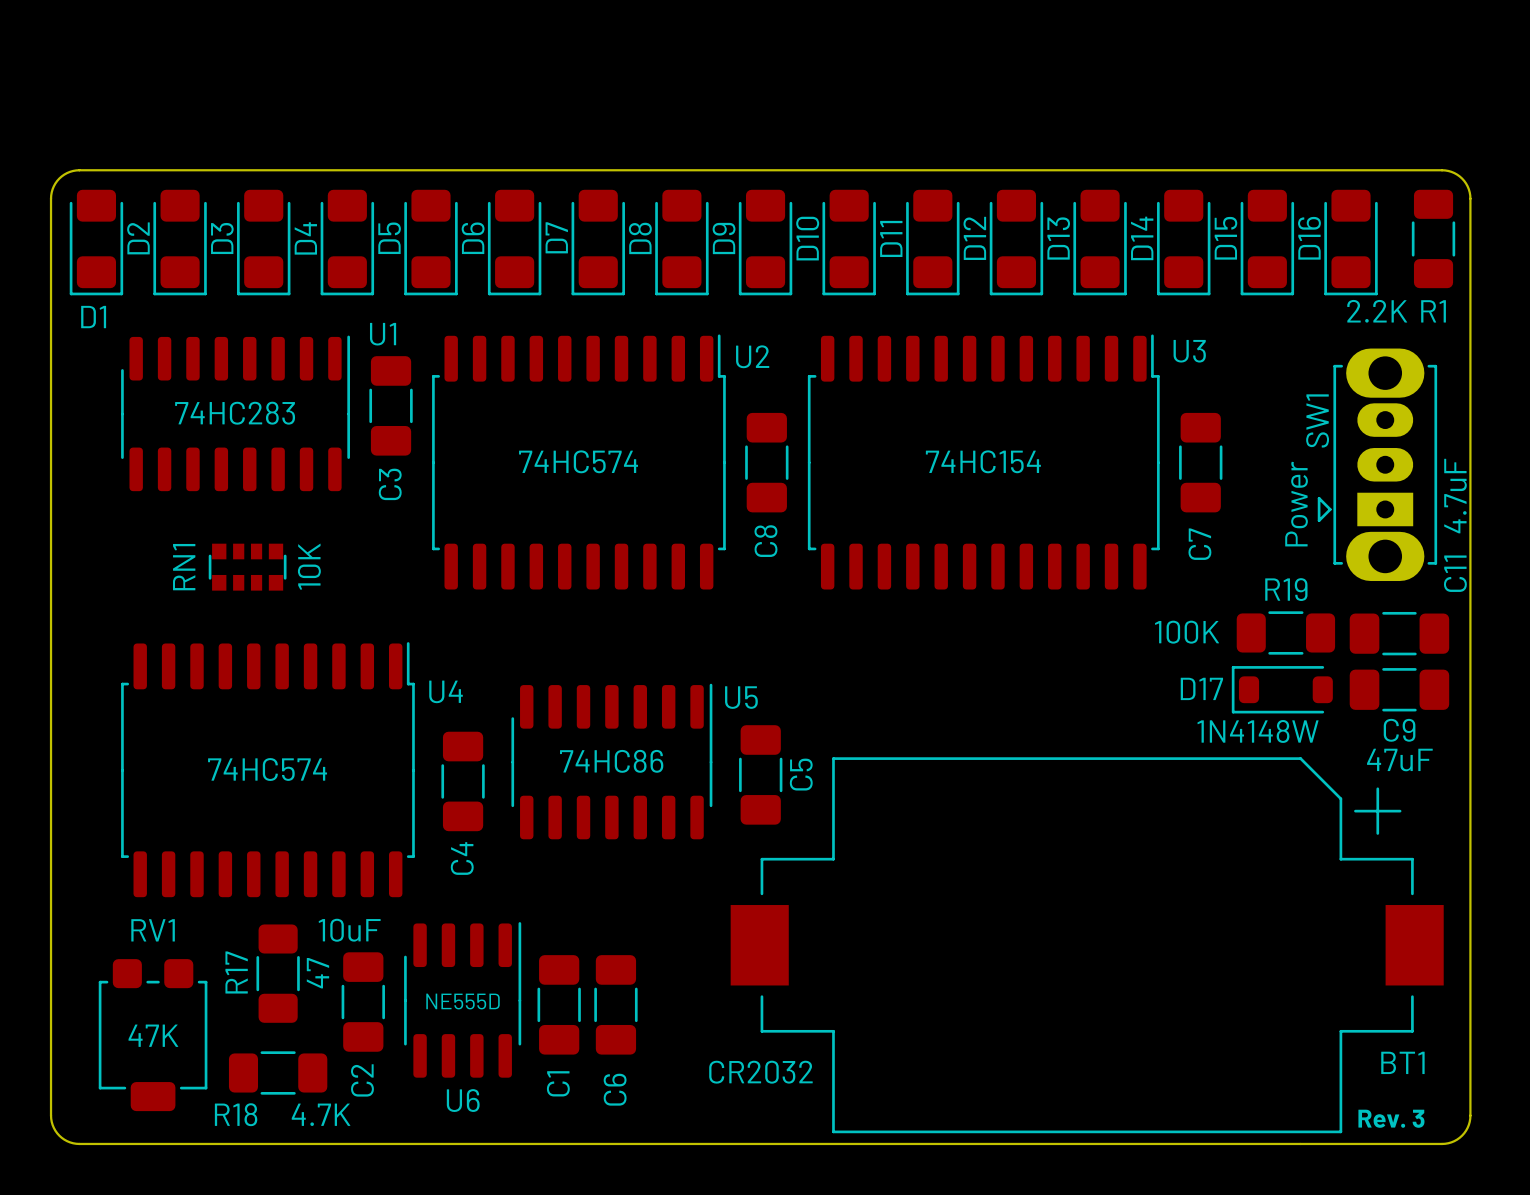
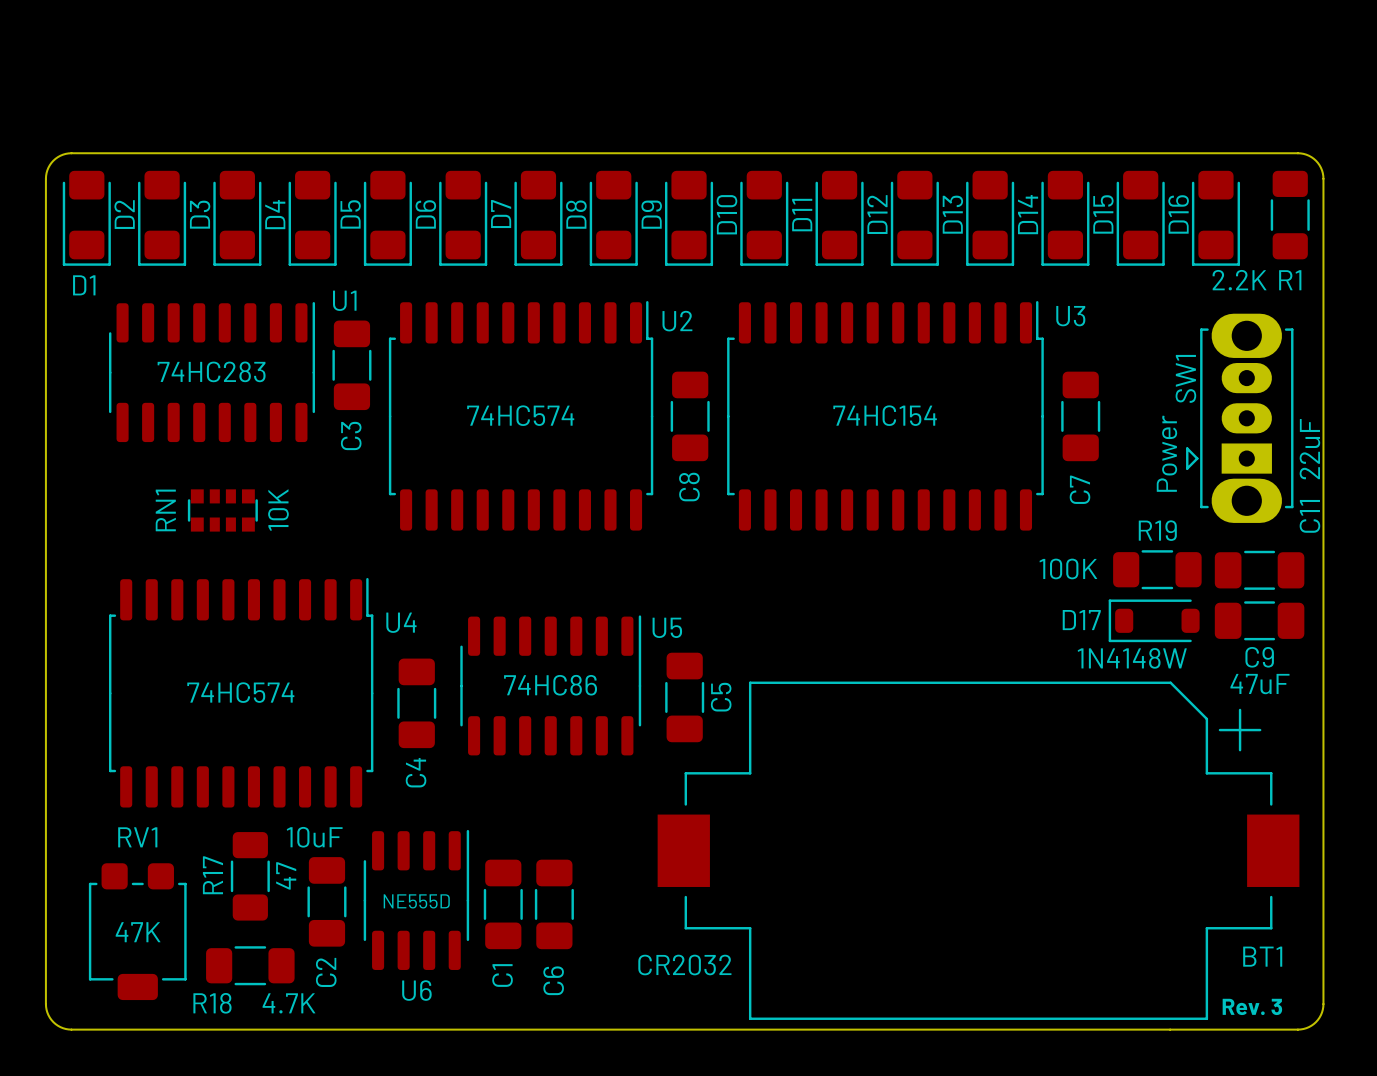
C11 value: 4.7uF (1455, 496) -> 22uF (1309, 449)

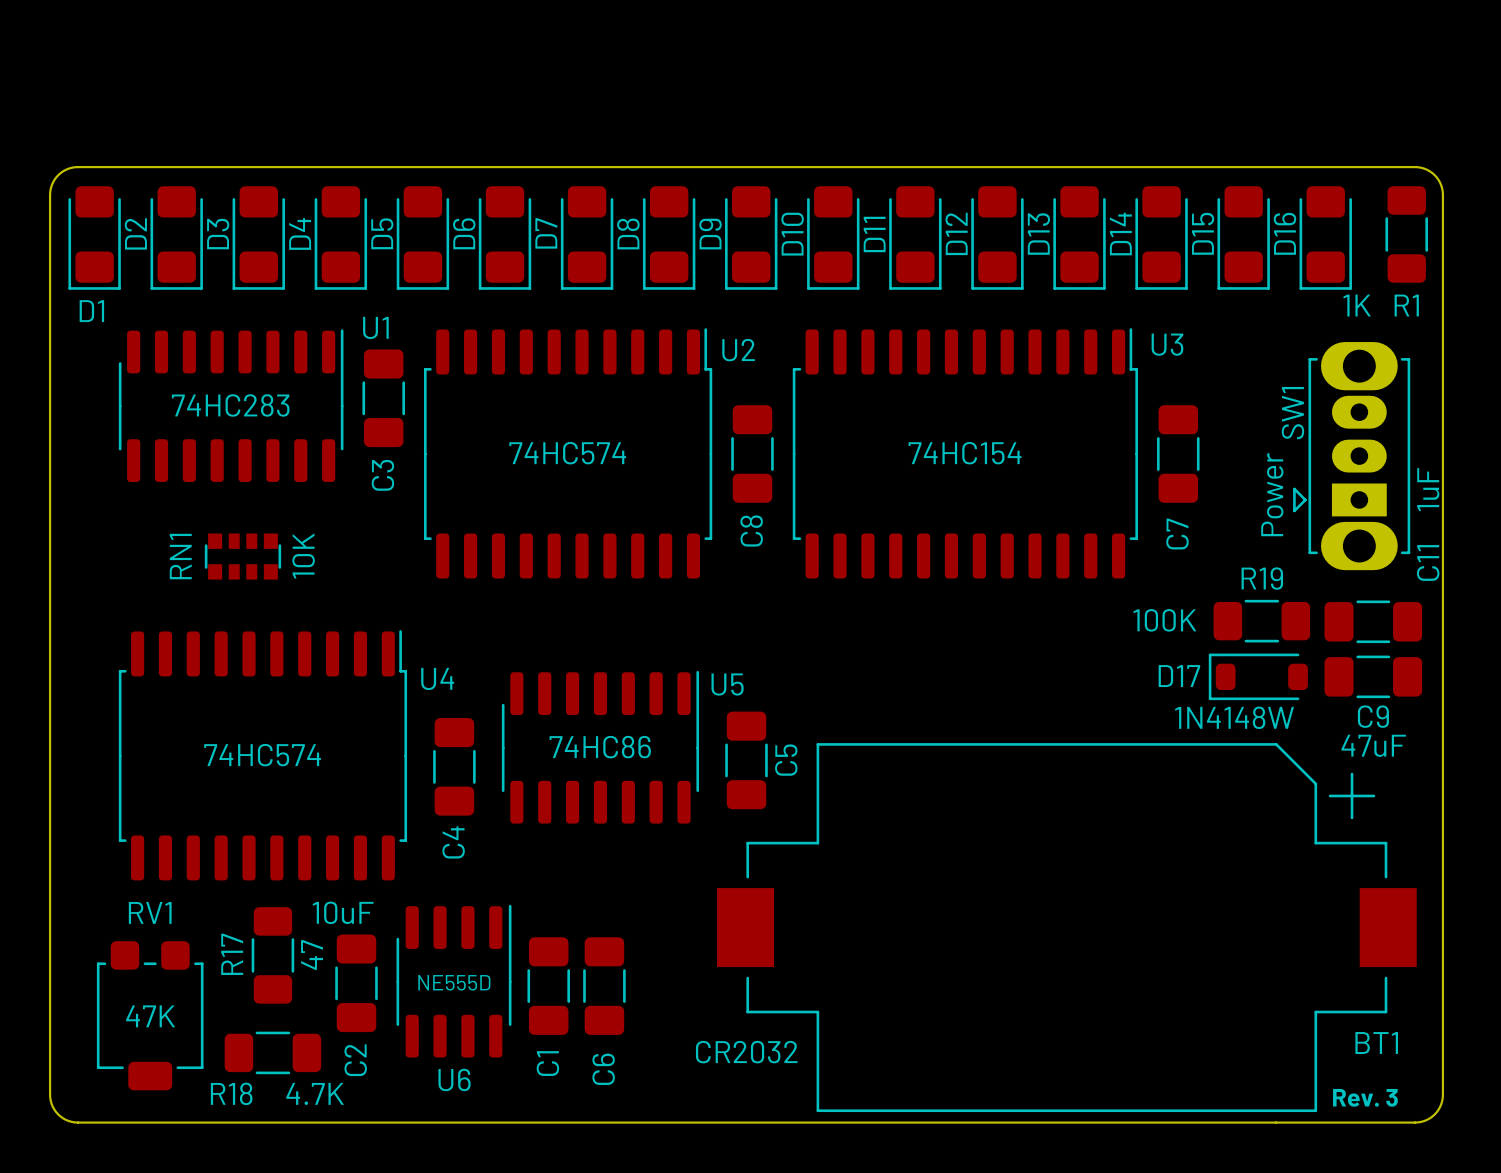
R1 value: 2.2K (1239, 280) -> 1K (1357, 305)
C11 value: 22uF (1309, 449) -> 1uF (1428, 489)

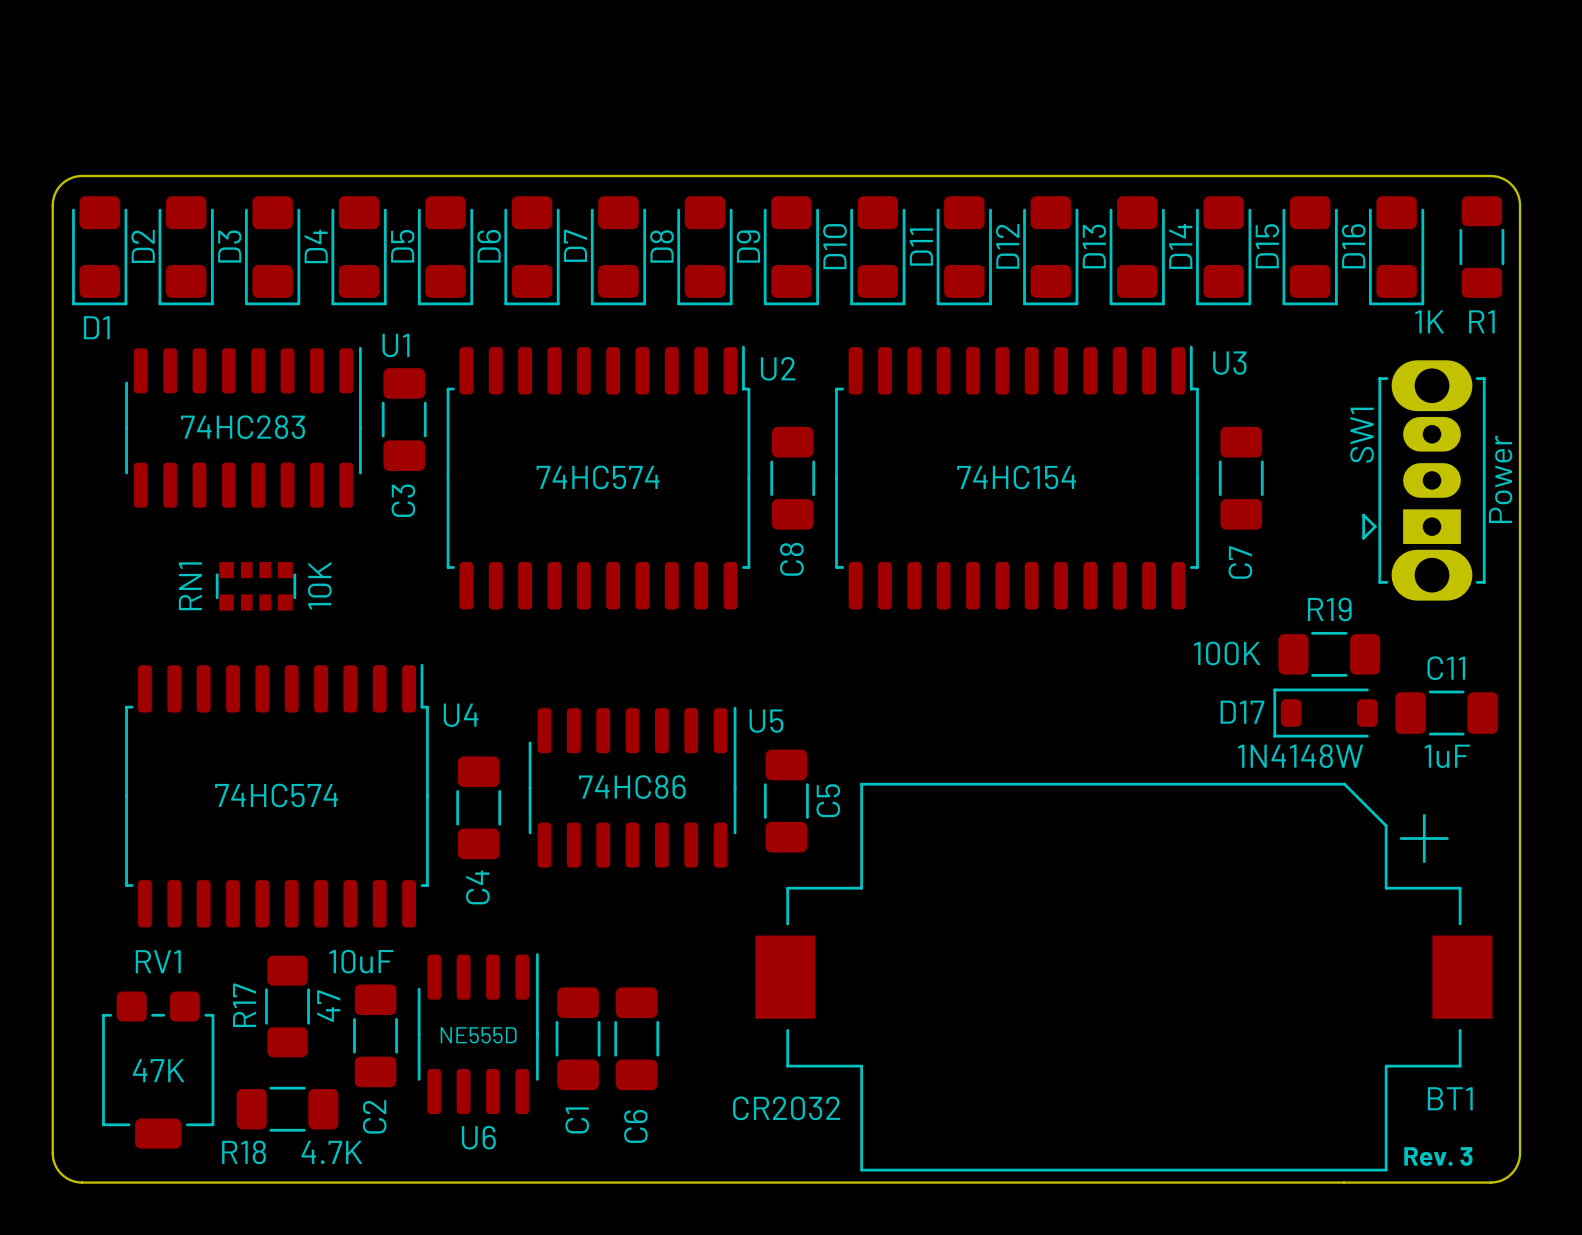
SW1 value position: Power (1272, 494) -> Power (1500, 479)
C11: 1uF (1373, 621) -> none
C9 name: C9 (1373, 716) -> C11 (1446, 668)
C9 value: 47uF (1373, 745) -> 1uF (1447, 756)

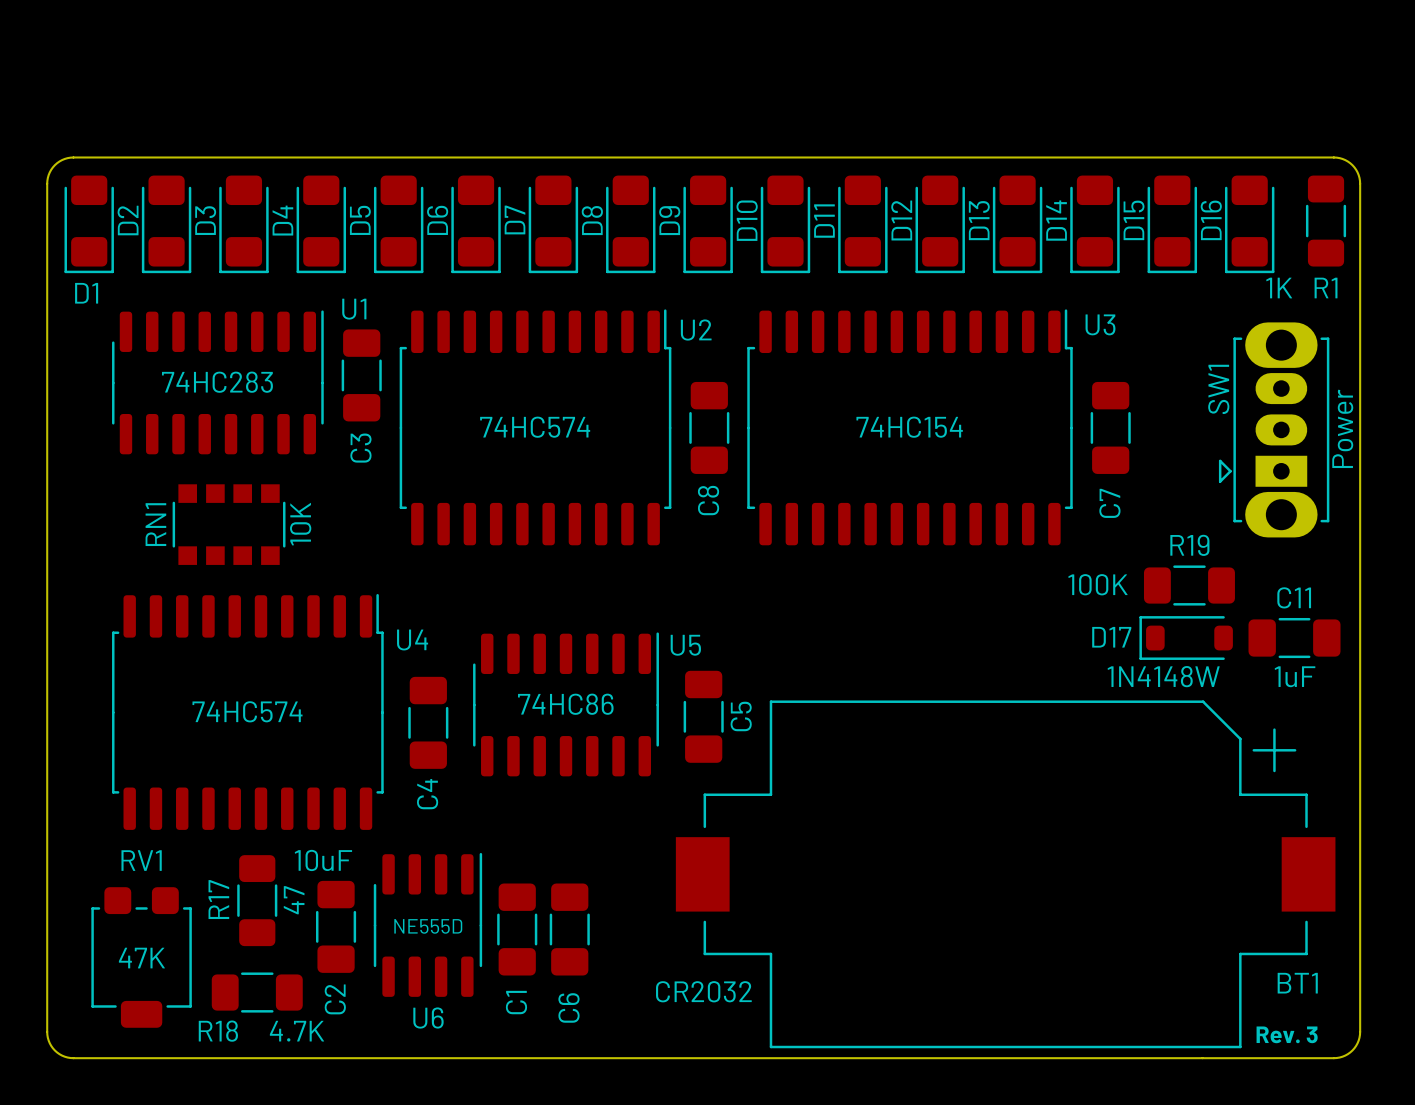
RN1 footprint: [215, 562, 297, 611] -> [172, 484, 286, 565]

